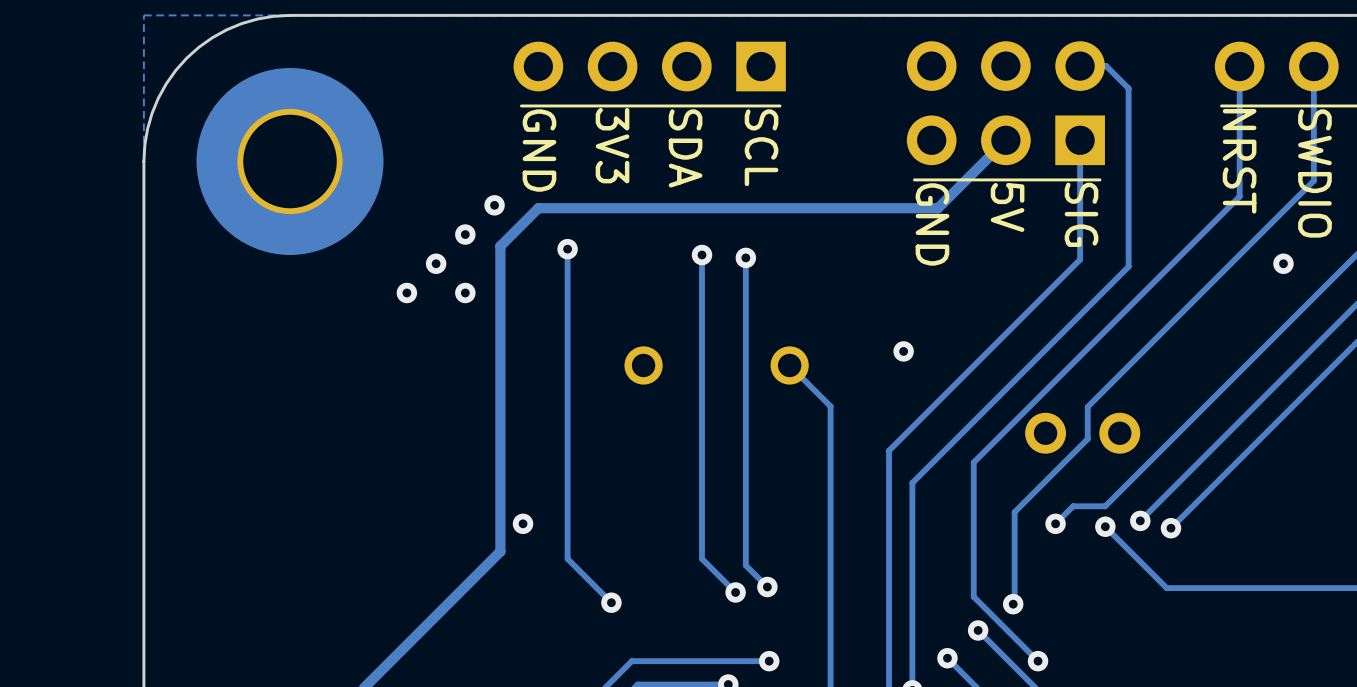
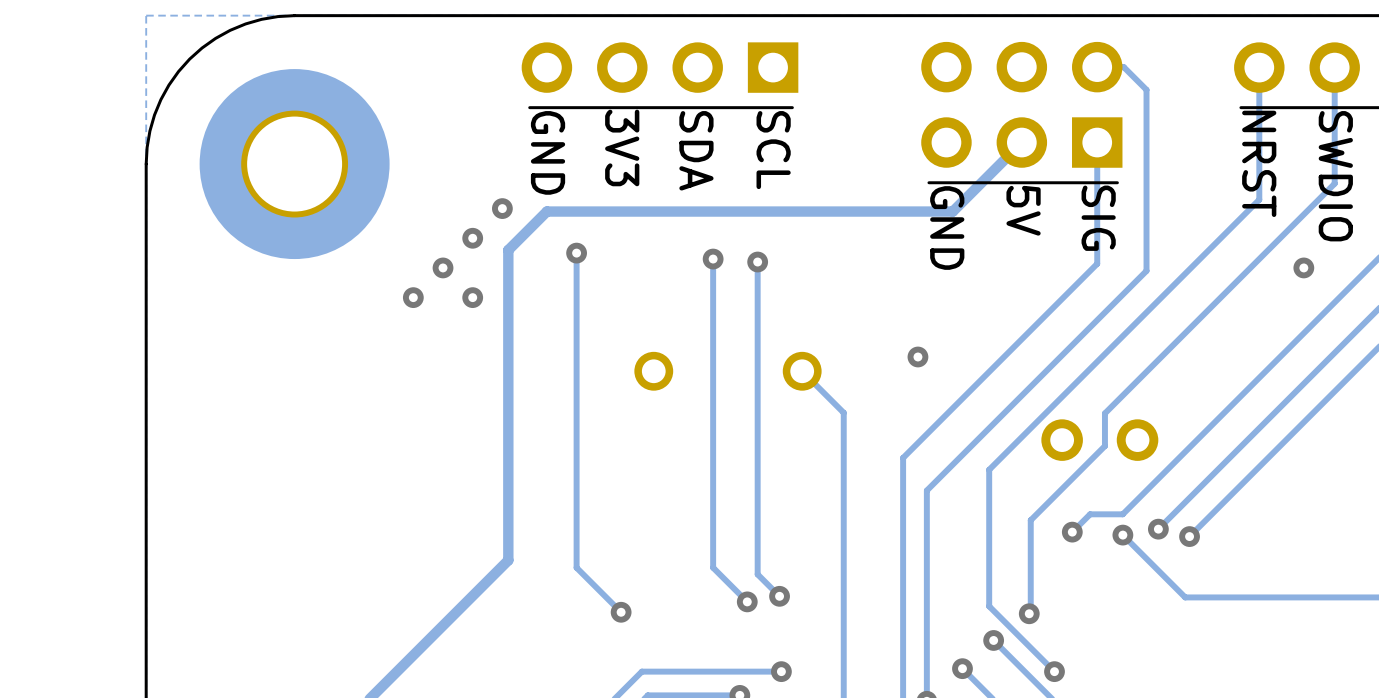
via: (523, 523) -> none

